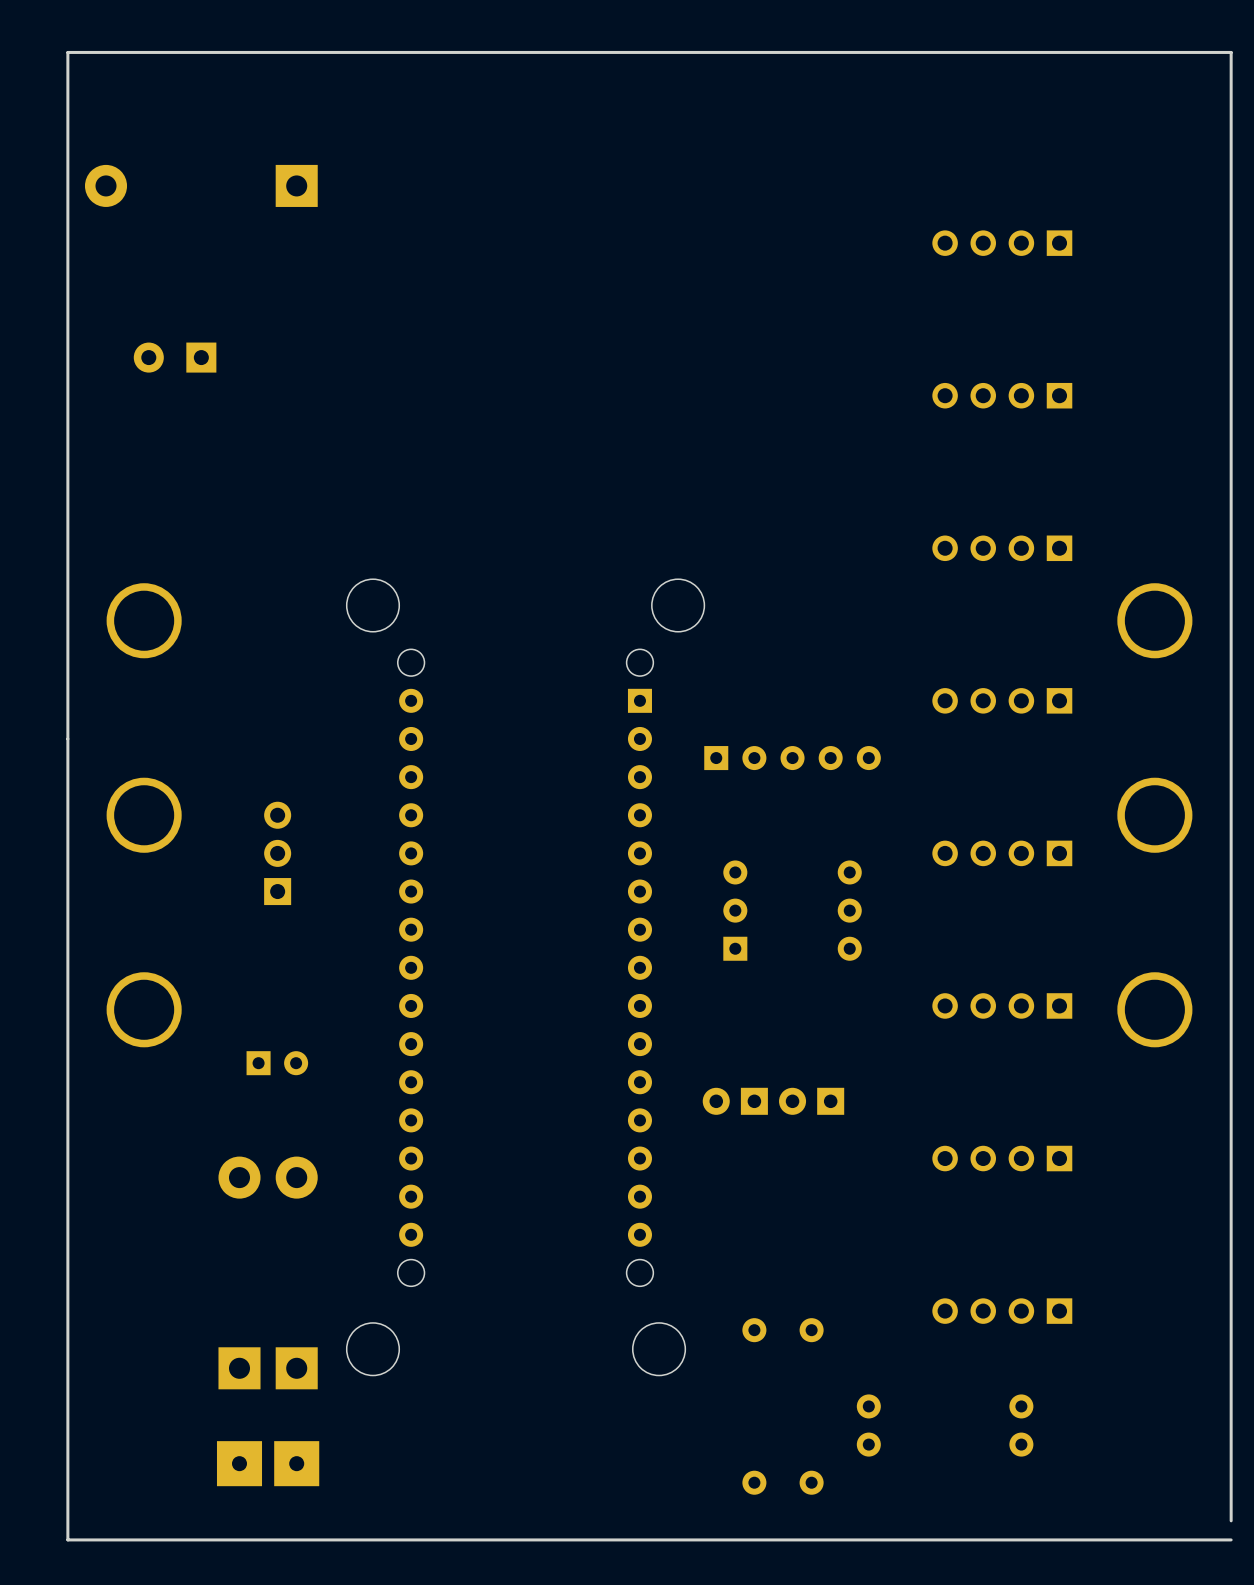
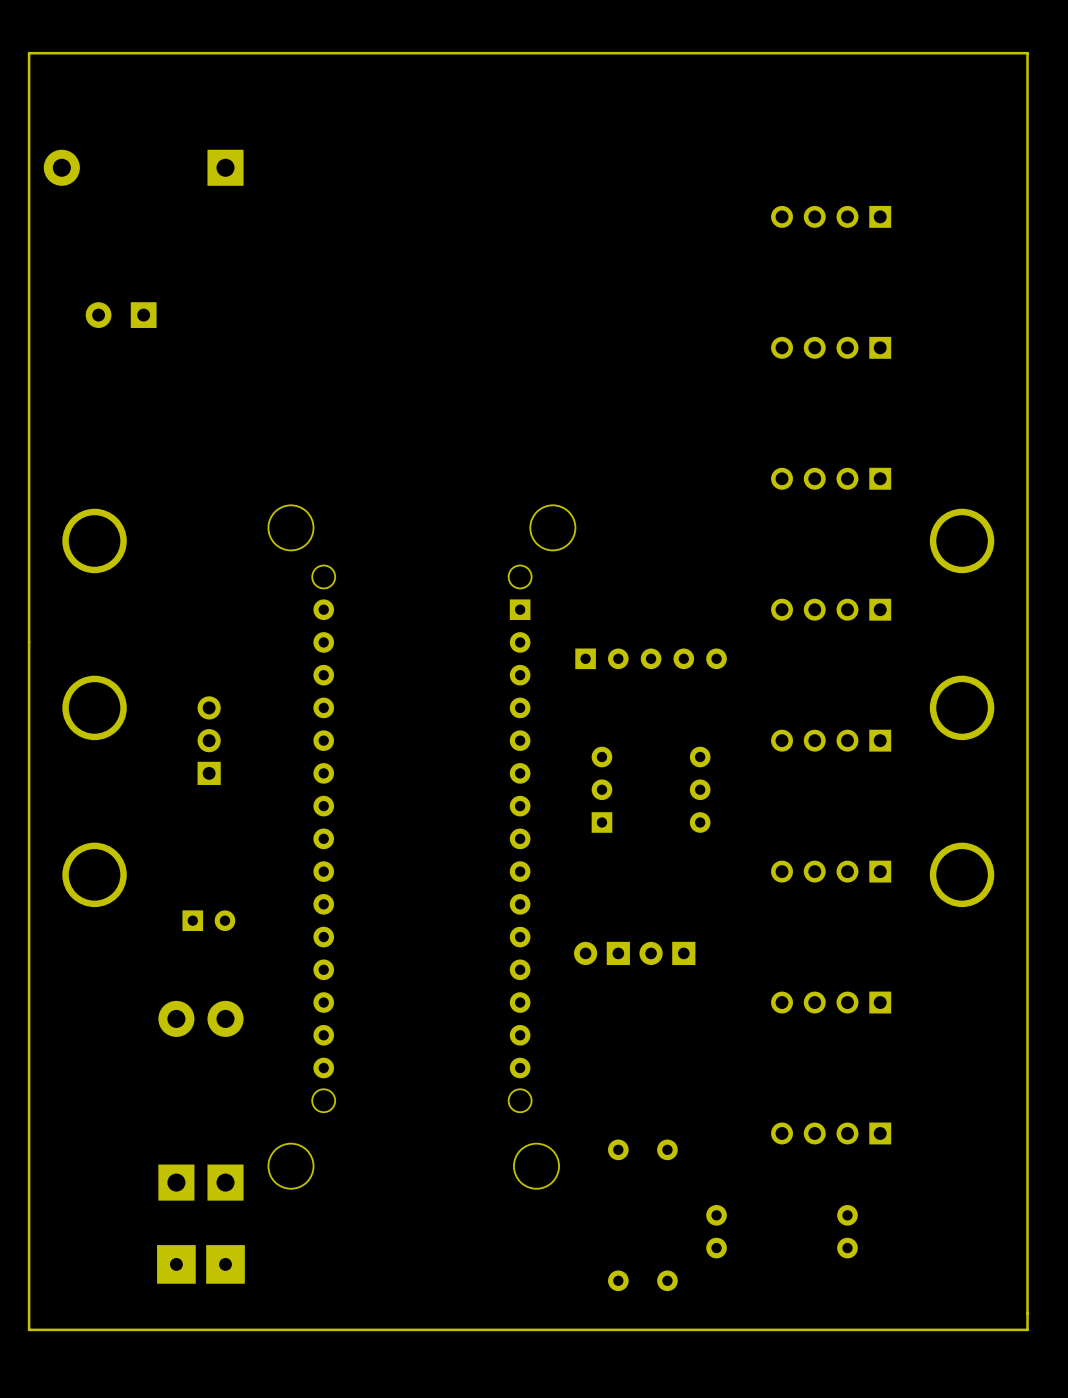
board edge: none -> (1027, 1313) (1027, 1329)

